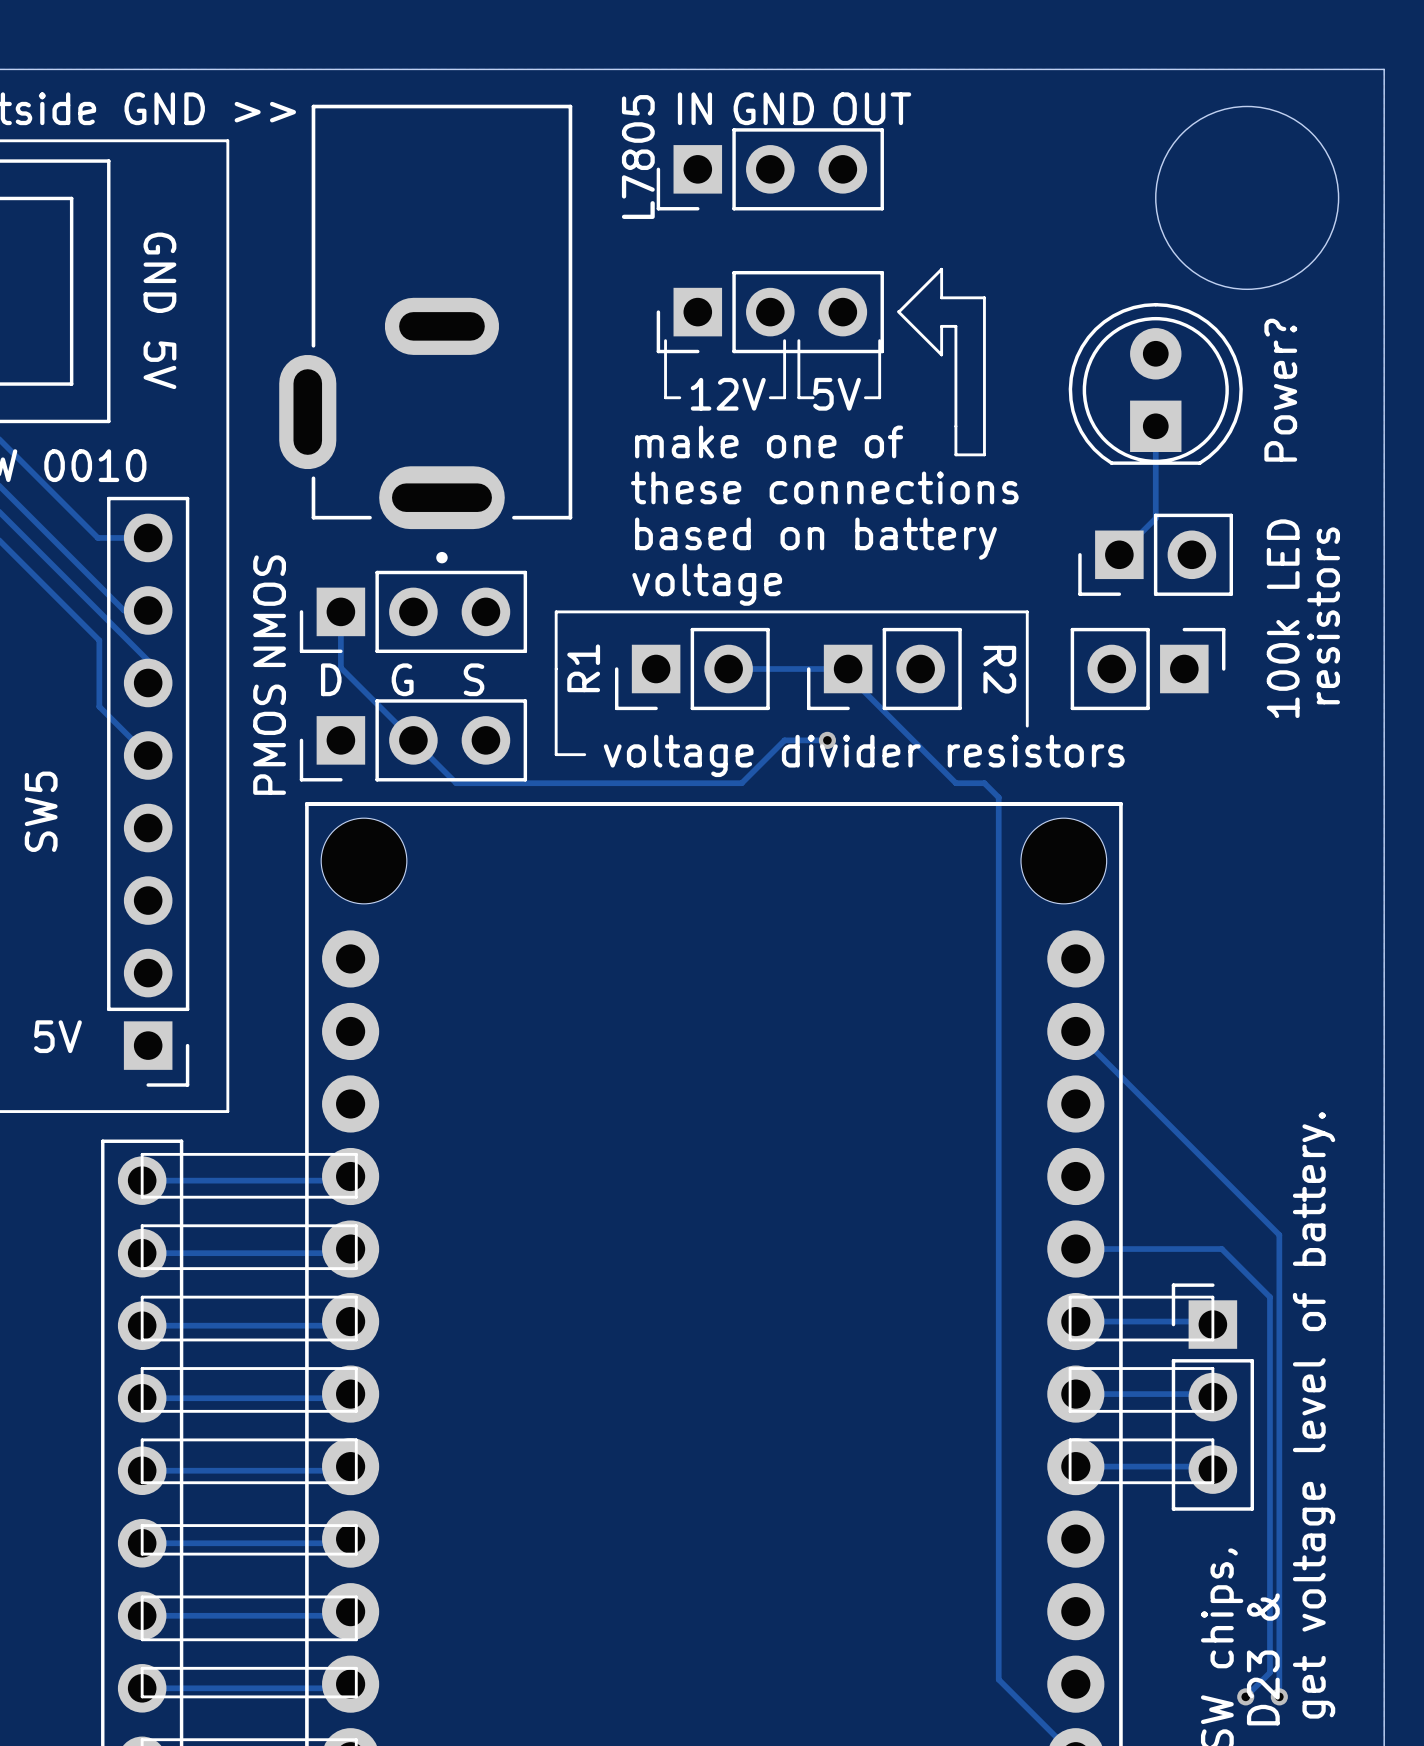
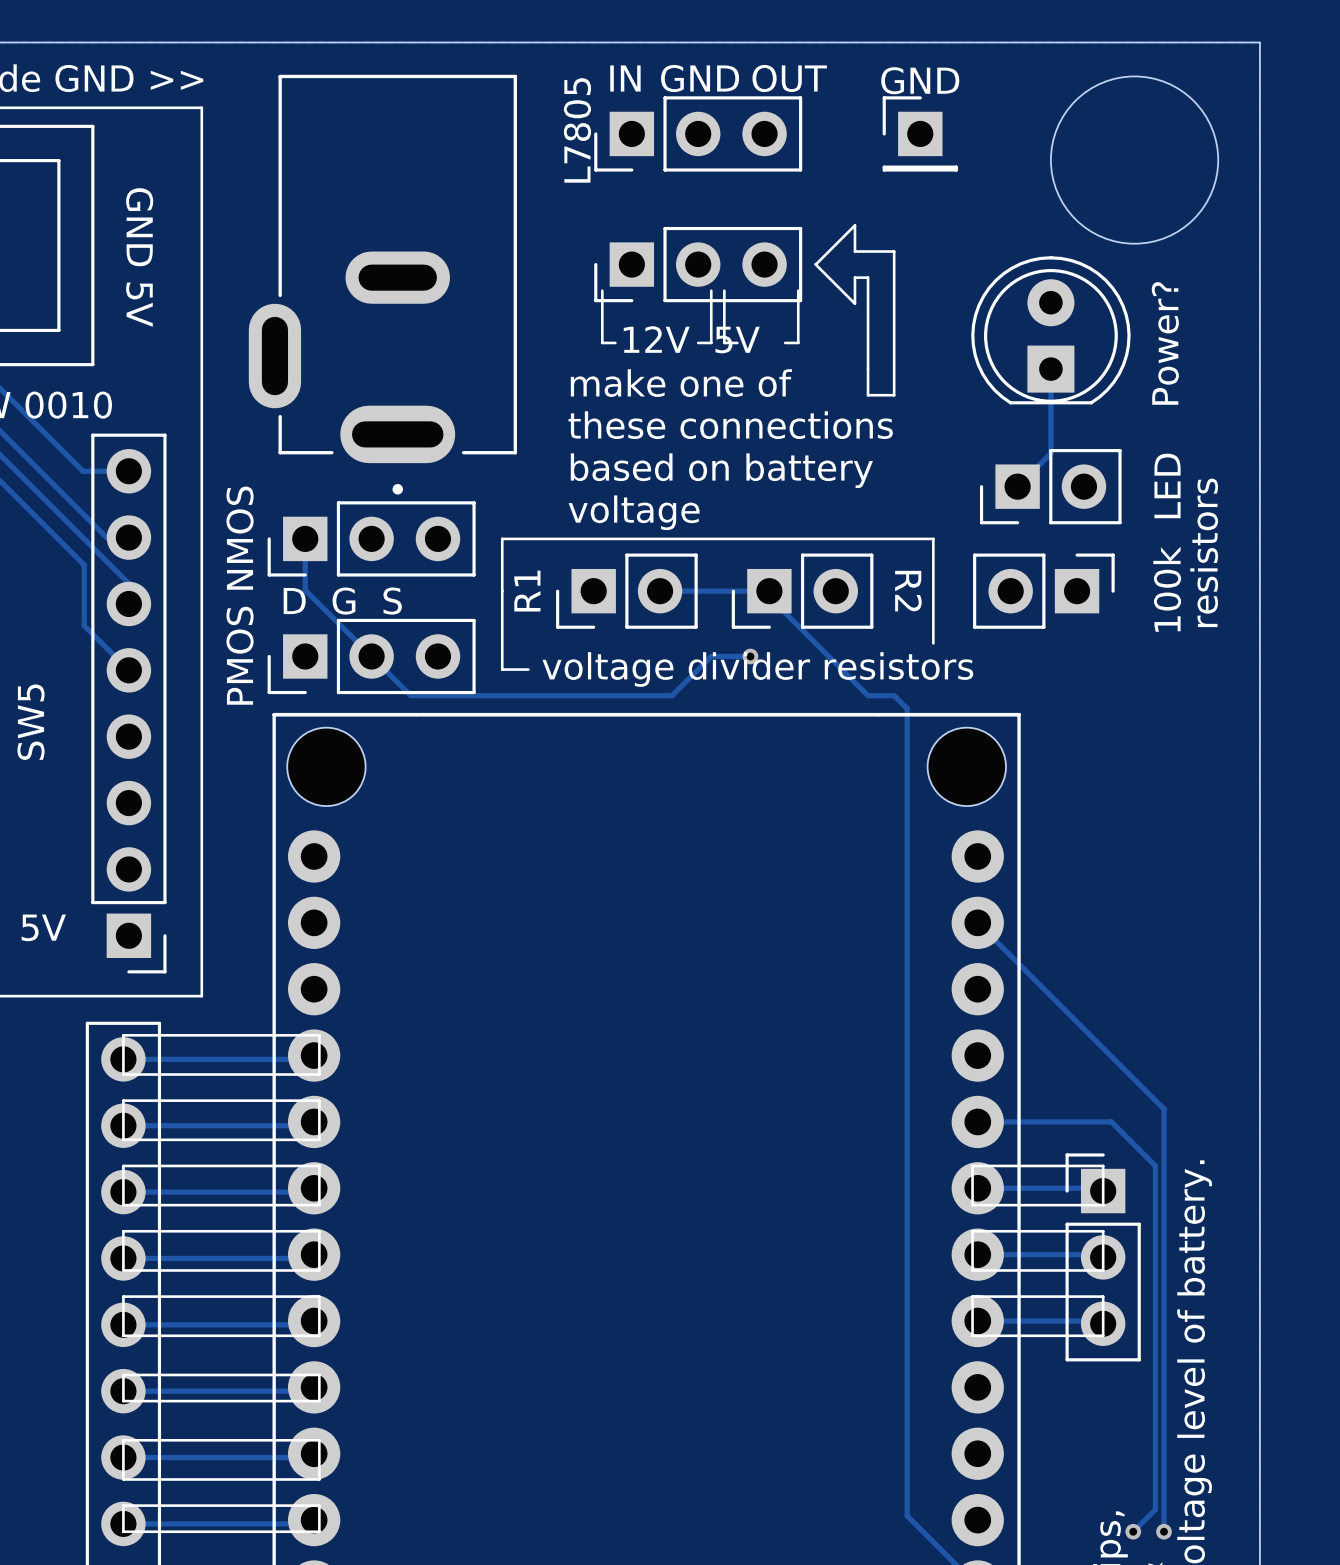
text: none -> GND (920, 80)
part: none -> (920, 133)

